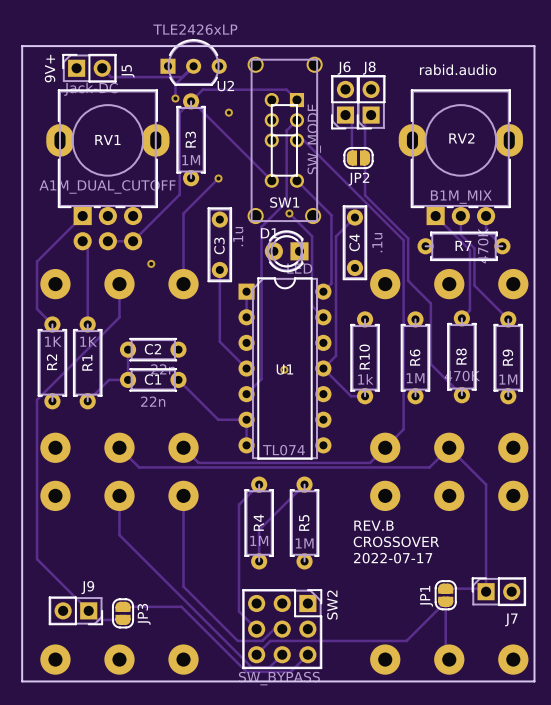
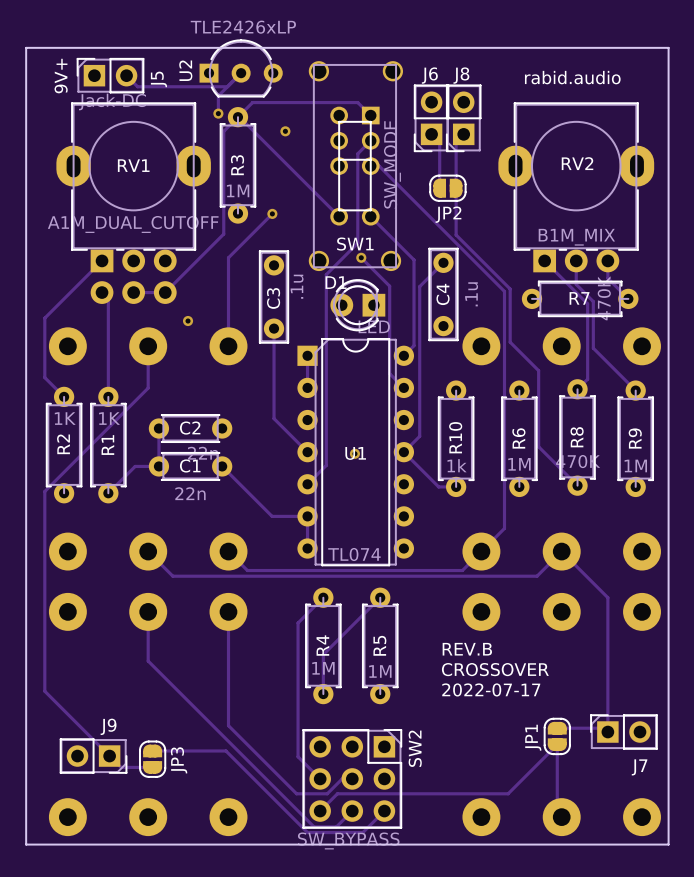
U2 name rotation: 0° (225, 86) -> 90° counterclockwise (185, 70)
U2 name position: U2 (225, 86) -> U2 (185, 70)

